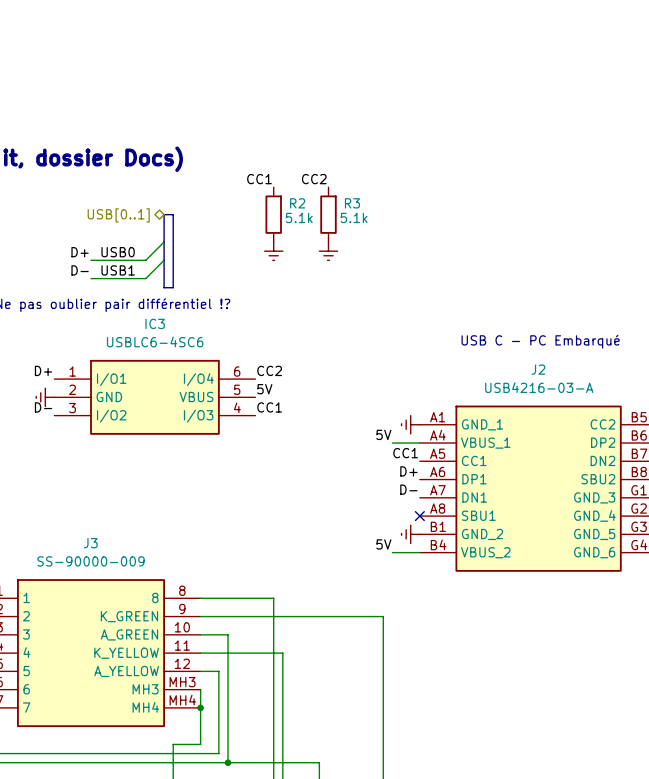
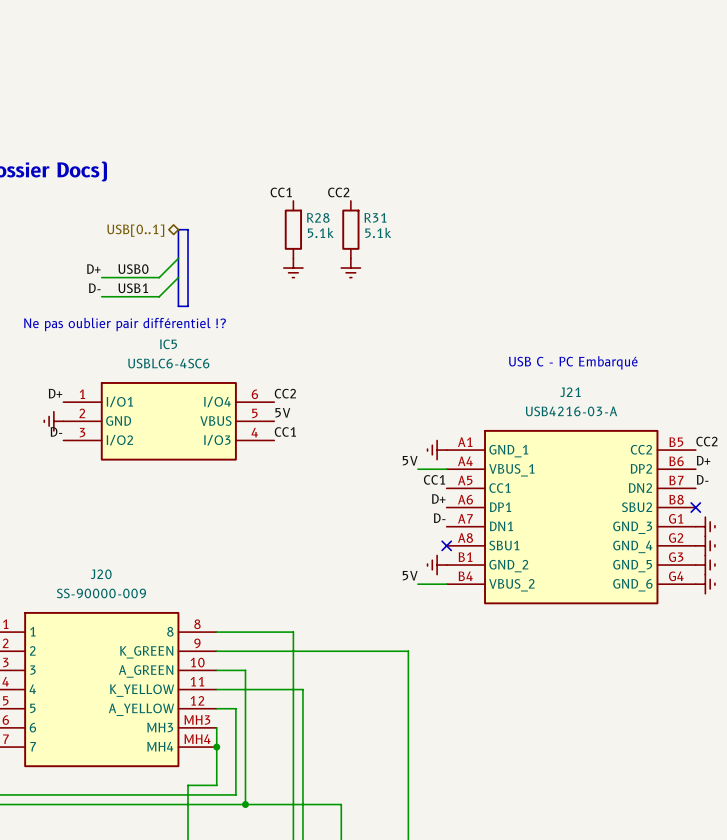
R2 name: R2 (297, 203) -> R28 (318, 217)
R3 name: R3 (352, 203) -> R31 (375, 217)
IC3 name: IC3 (155, 323) -> IC5 (168, 344)
J2 name: J2 (538, 369) -> J21 (570, 392)
J3 name: J3 (90, 543) -> J20 (101, 574)

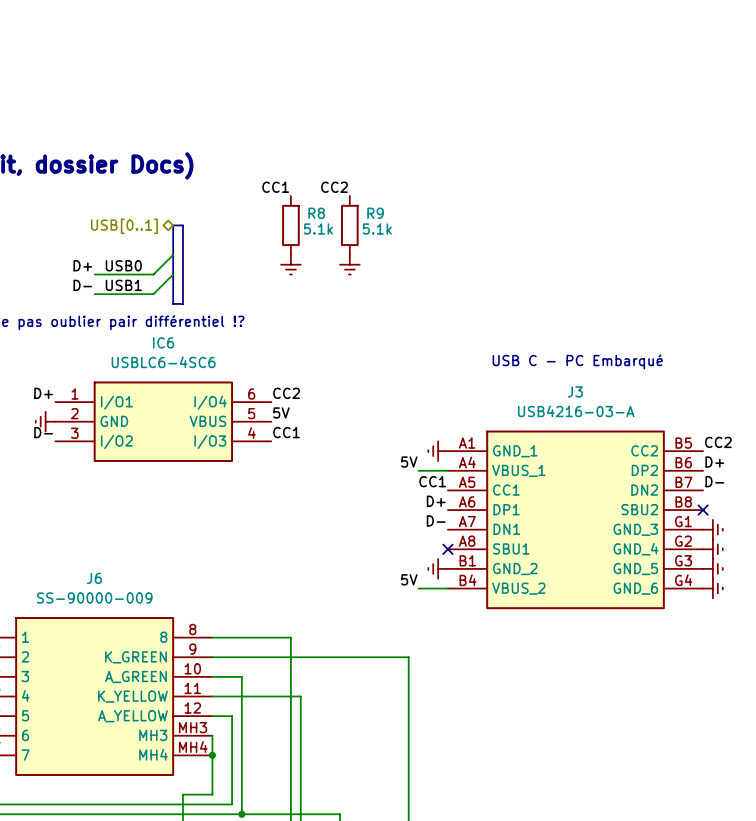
R28 name: R28 (318, 217) -> R8 (316, 213)
R31 name: R31 (375, 217) -> R9 (375, 213)
IC5 name: IC5 (168, 344) -> IC6 (163, 342)
J21 name: J21 (570, 392) -> J3 (575, 391)
J20 name: J20 (101, 574) -> J6 (94, 578)

